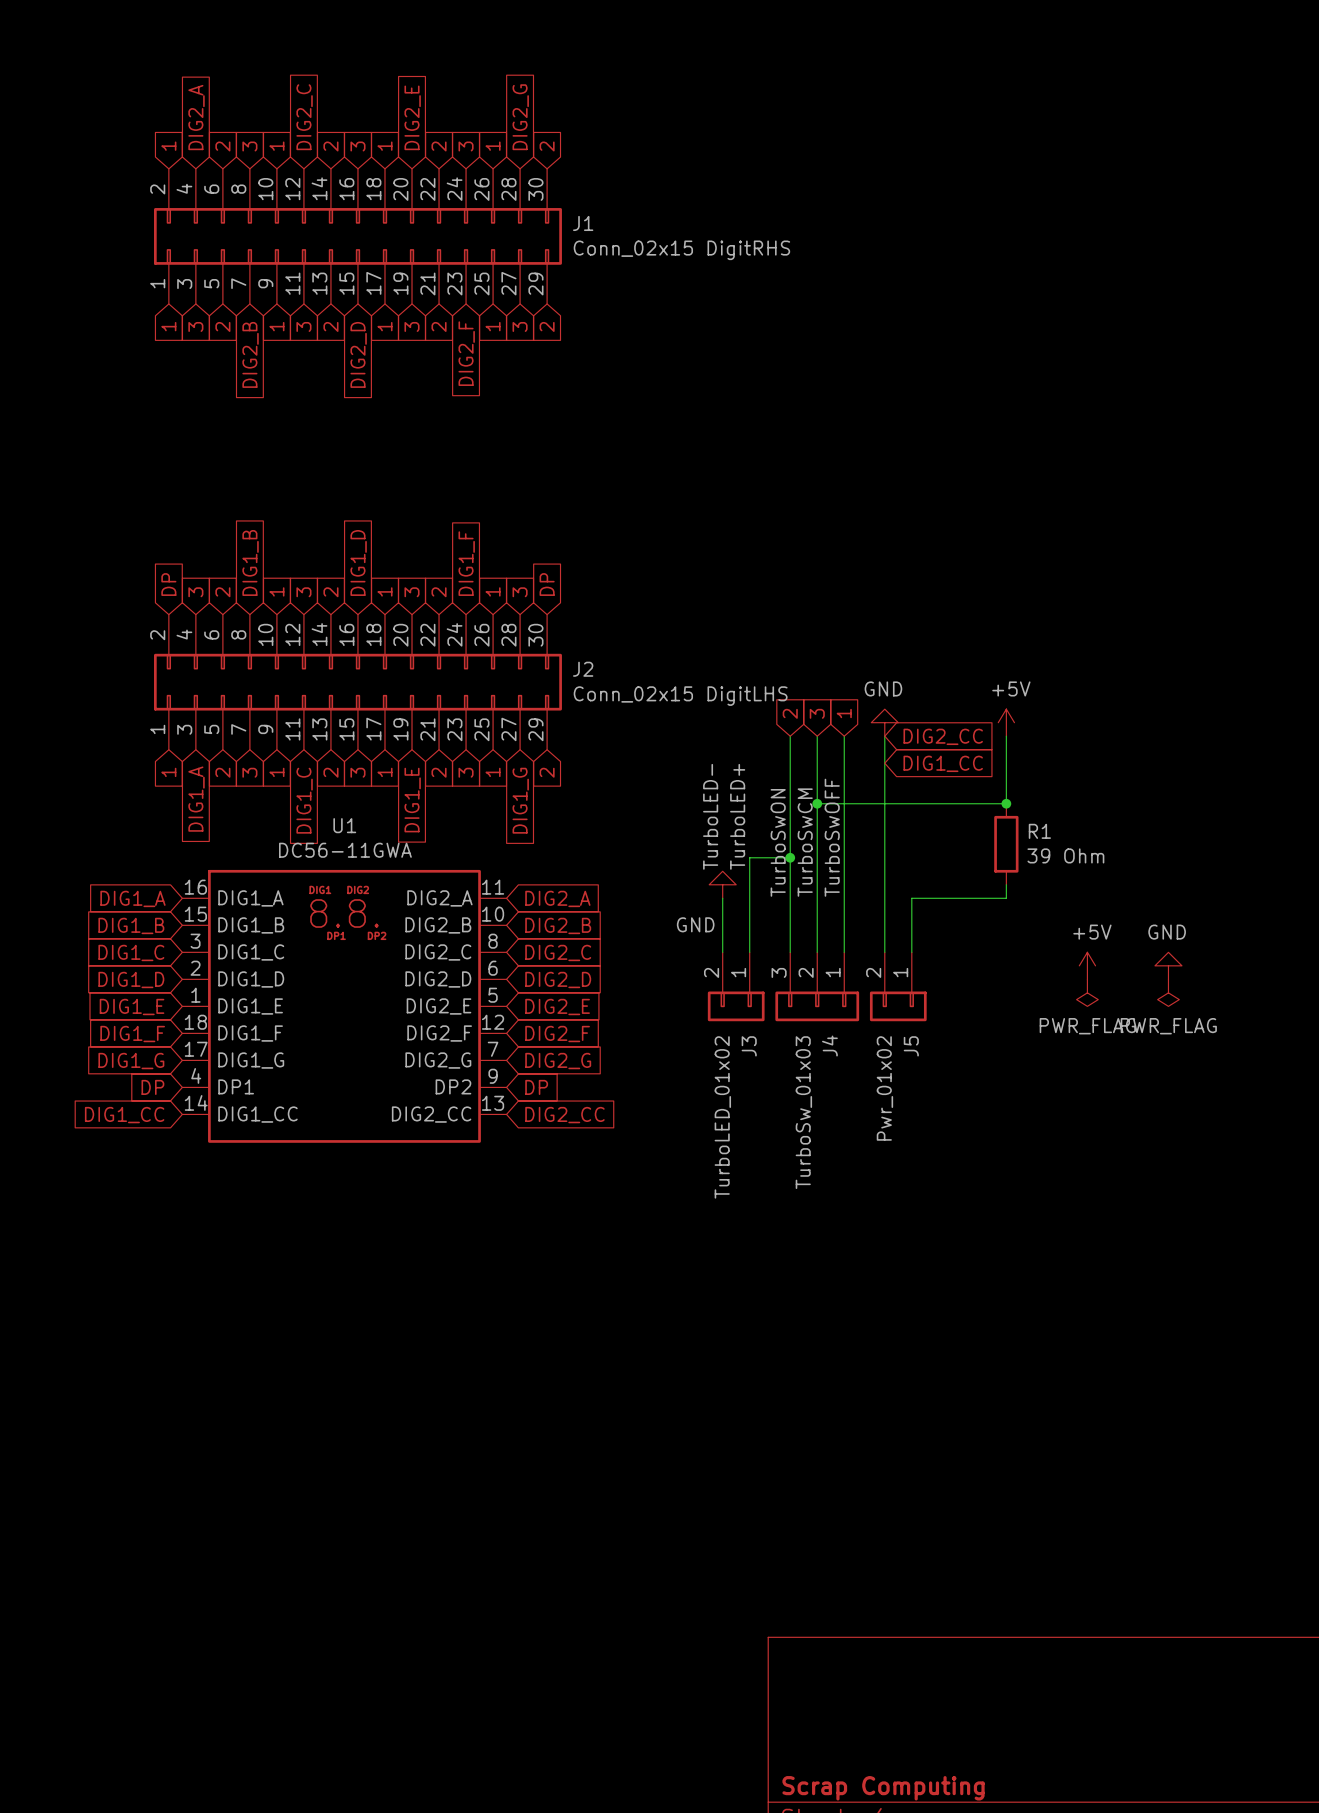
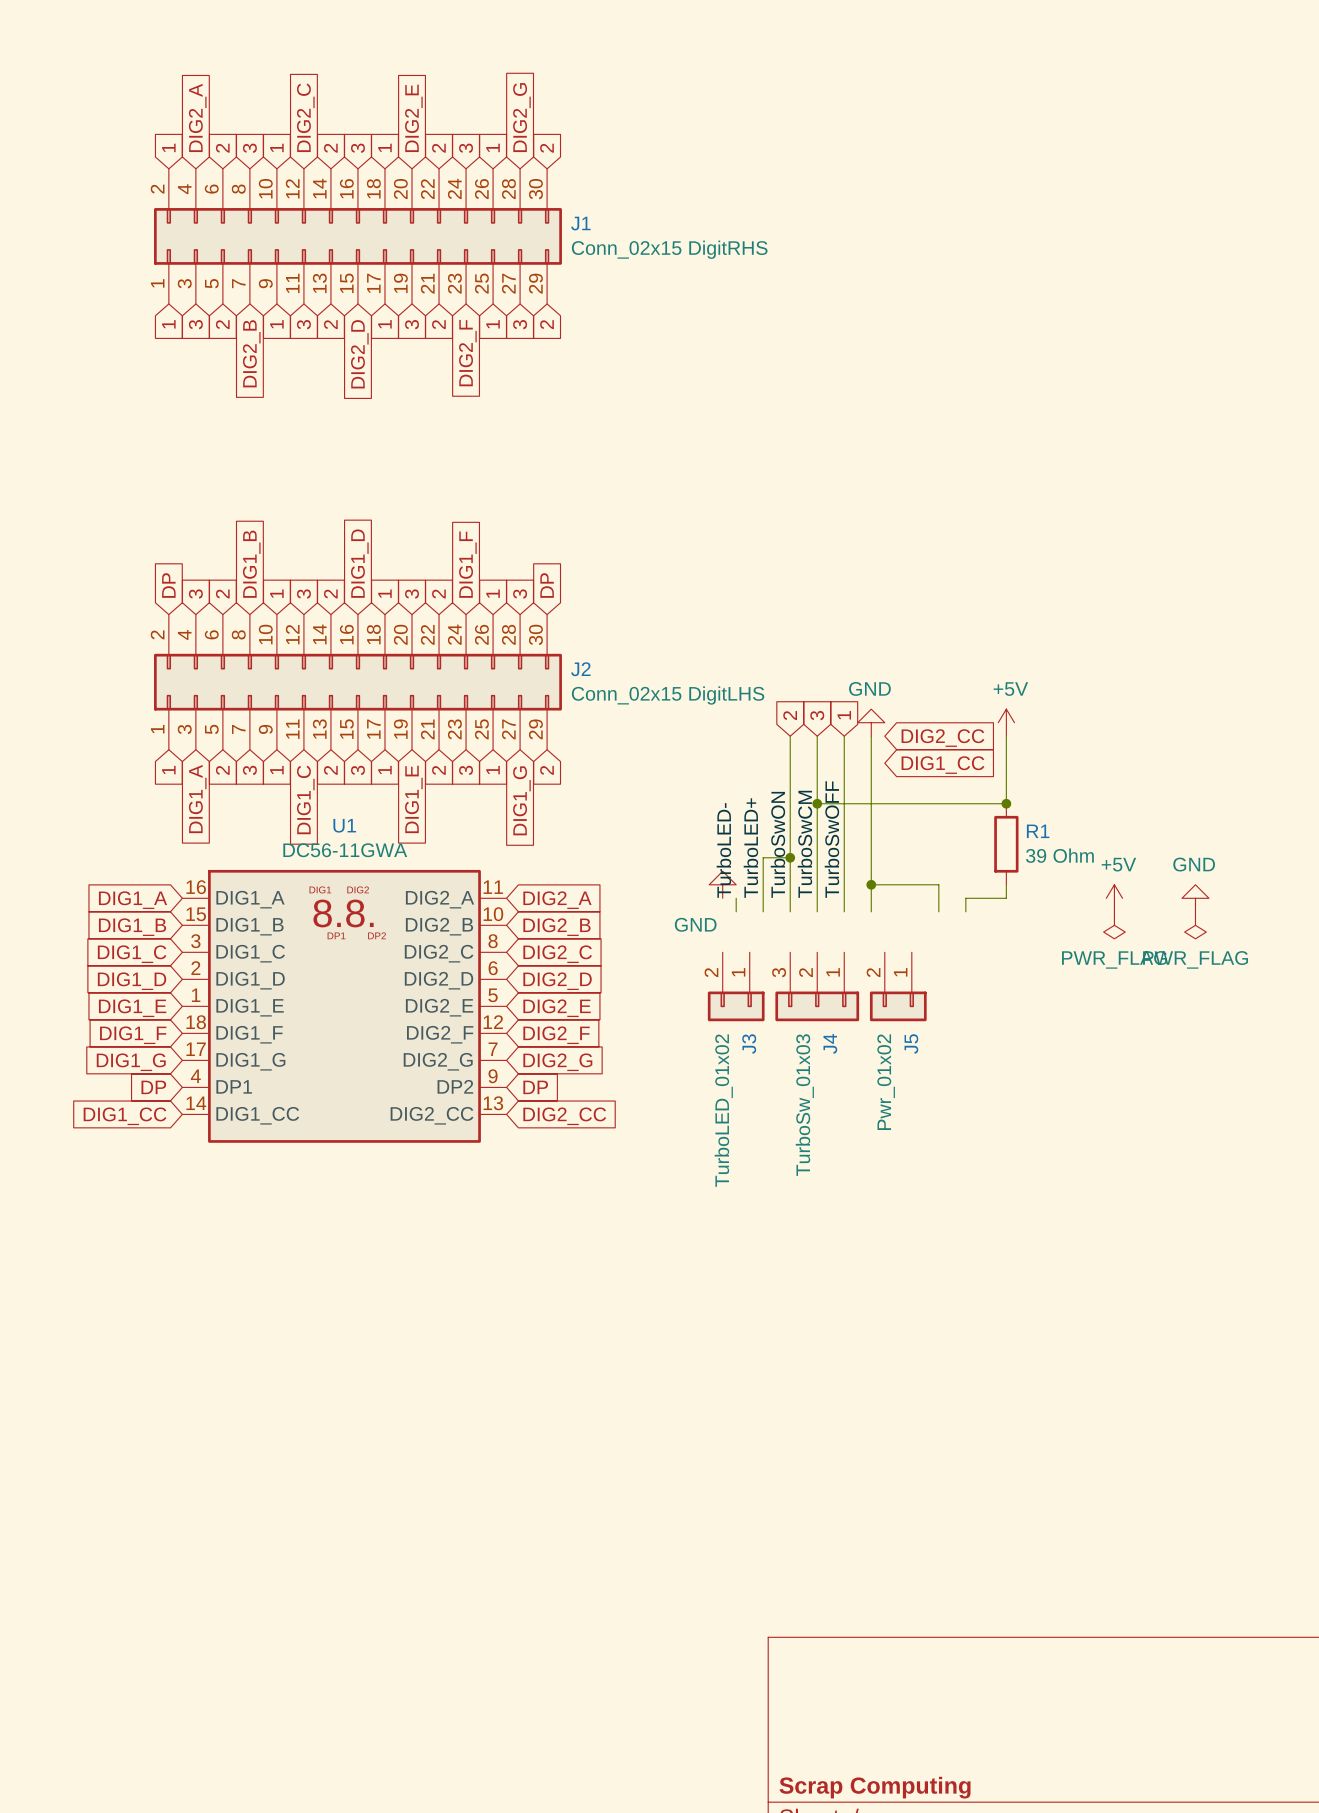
power symbol position: GND (884, 722) -> GND (871, 722)
wire: none -> (871, 736) (871, 911)
wire: (884, 736) (884, 952) -> none
label position: TurboLED- (710, 816) -> TurboLED- (723, 850)
label position: TurboLED+ (737, 816) -> TurboLED+ (750, 848)
wire: (763, 857) (749, 857) (749, 952) -> (763, 857) (763, 911)
wire: none -> (871, 884) (938, 884) (938, 911)
junction: none -> (871, 884)
wire: (722, 898) (722, 952) -> none
wire: none -> (736, 898) (736, 911)
wire: (965, 898) (911, 898) (911, 952) -> (965, 898) (965, 911)
wire: (790, 911) (790, 952) -> none
wire: (817, 911) (817, 952) -> none
wire: (844, 911) (844, 952) -> none
power symbol: none -> PWR_FLAG (1114, 925)
power symbol: none -> PWR_FLAG (1195, 925)
power symbol position: +5V (1087, 965) -> +5V (1114, 898)
power symbol position: GND (1168, 965) -> GND (1195, 898)
power symbol: PWR_FLAG (1087, 992) -> none
power symbol: PWR_FLAG (1168, 992) -> none

